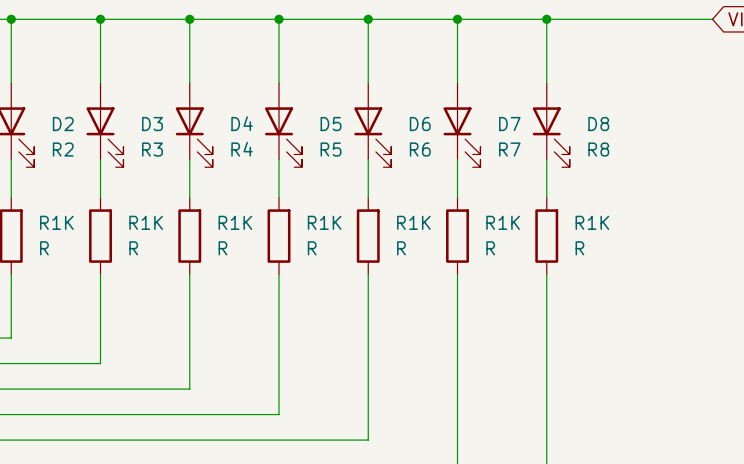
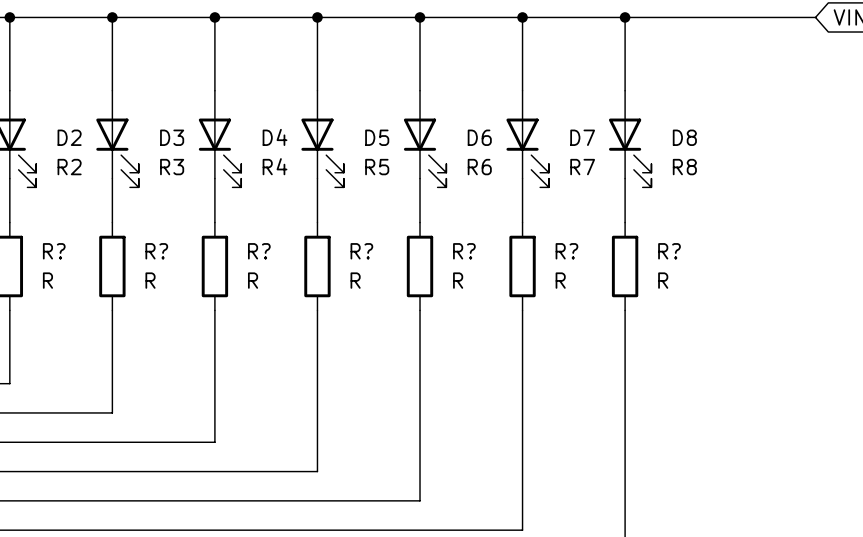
R1K name: R1K (56, 222) -> R? (54, 251)
R1K name: R1K (146, 222) -> R? (156, 251)
R1K name: R1K (235, 222) -> R? (259, 251)
R1K name: R1K (324, 222) -> R? (361, 251)
R1K name: R1K (413, 222) -> R? (464, 251)
R1K name: R1K (503, 222) -> R? (566, 251)
R1K name: R1K (592, 222) -> R? (669, 251)

